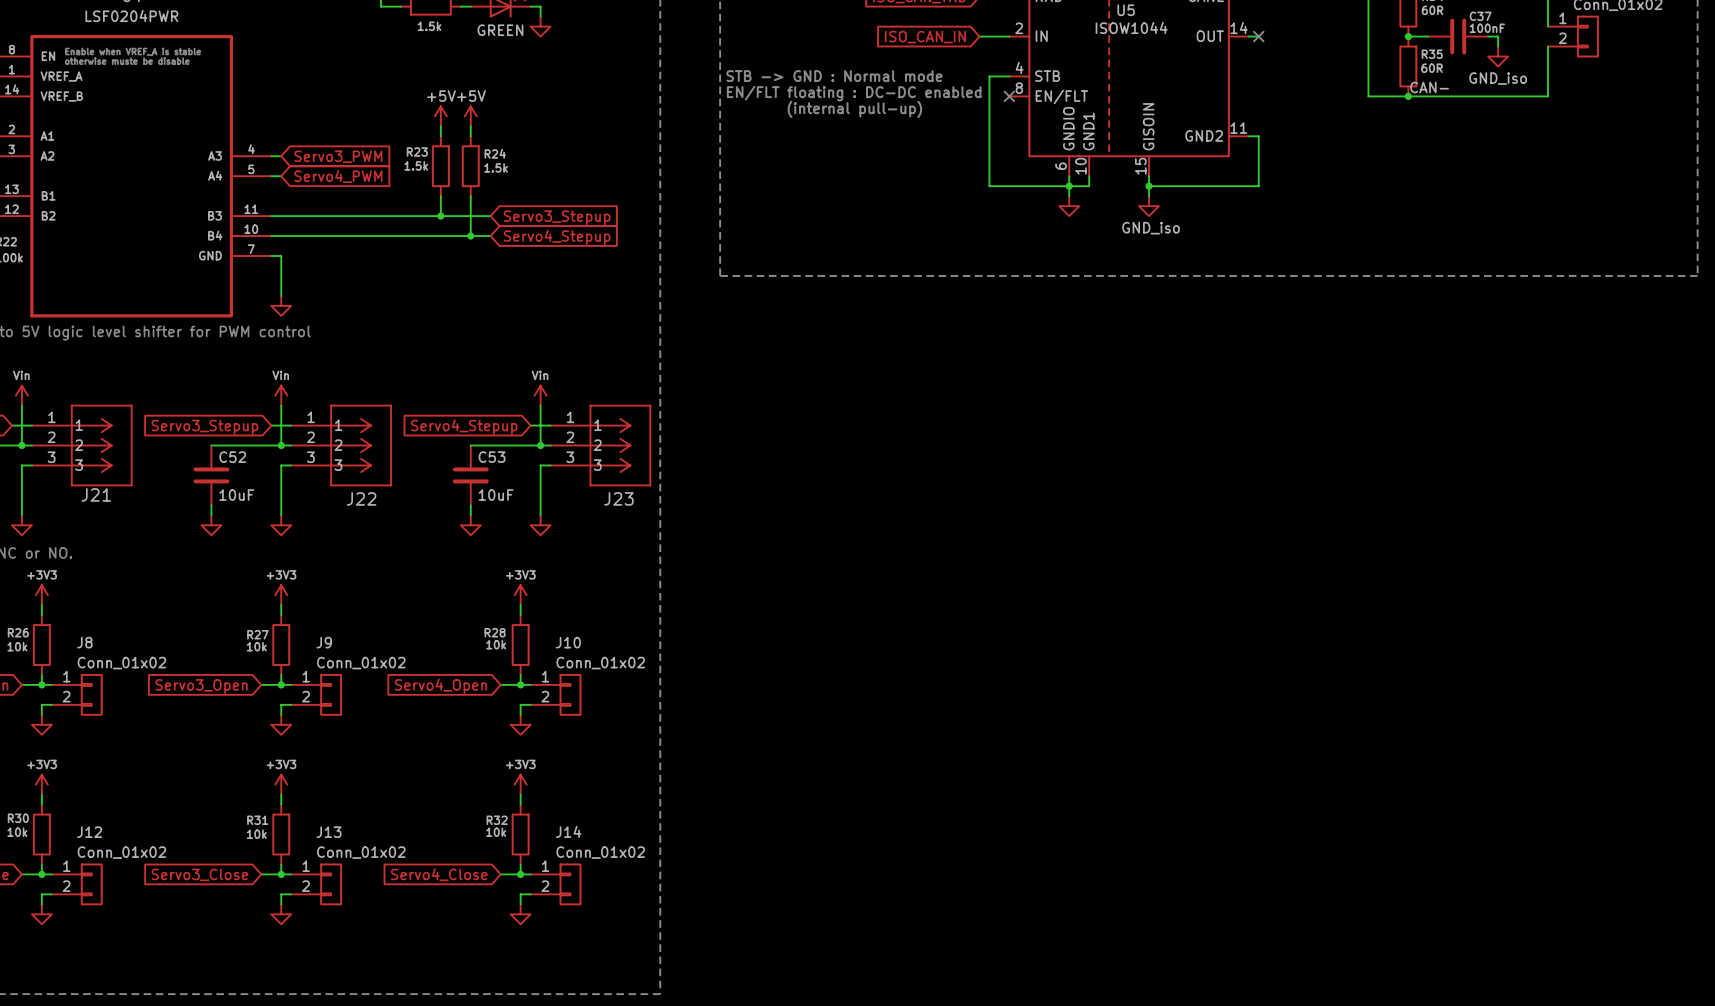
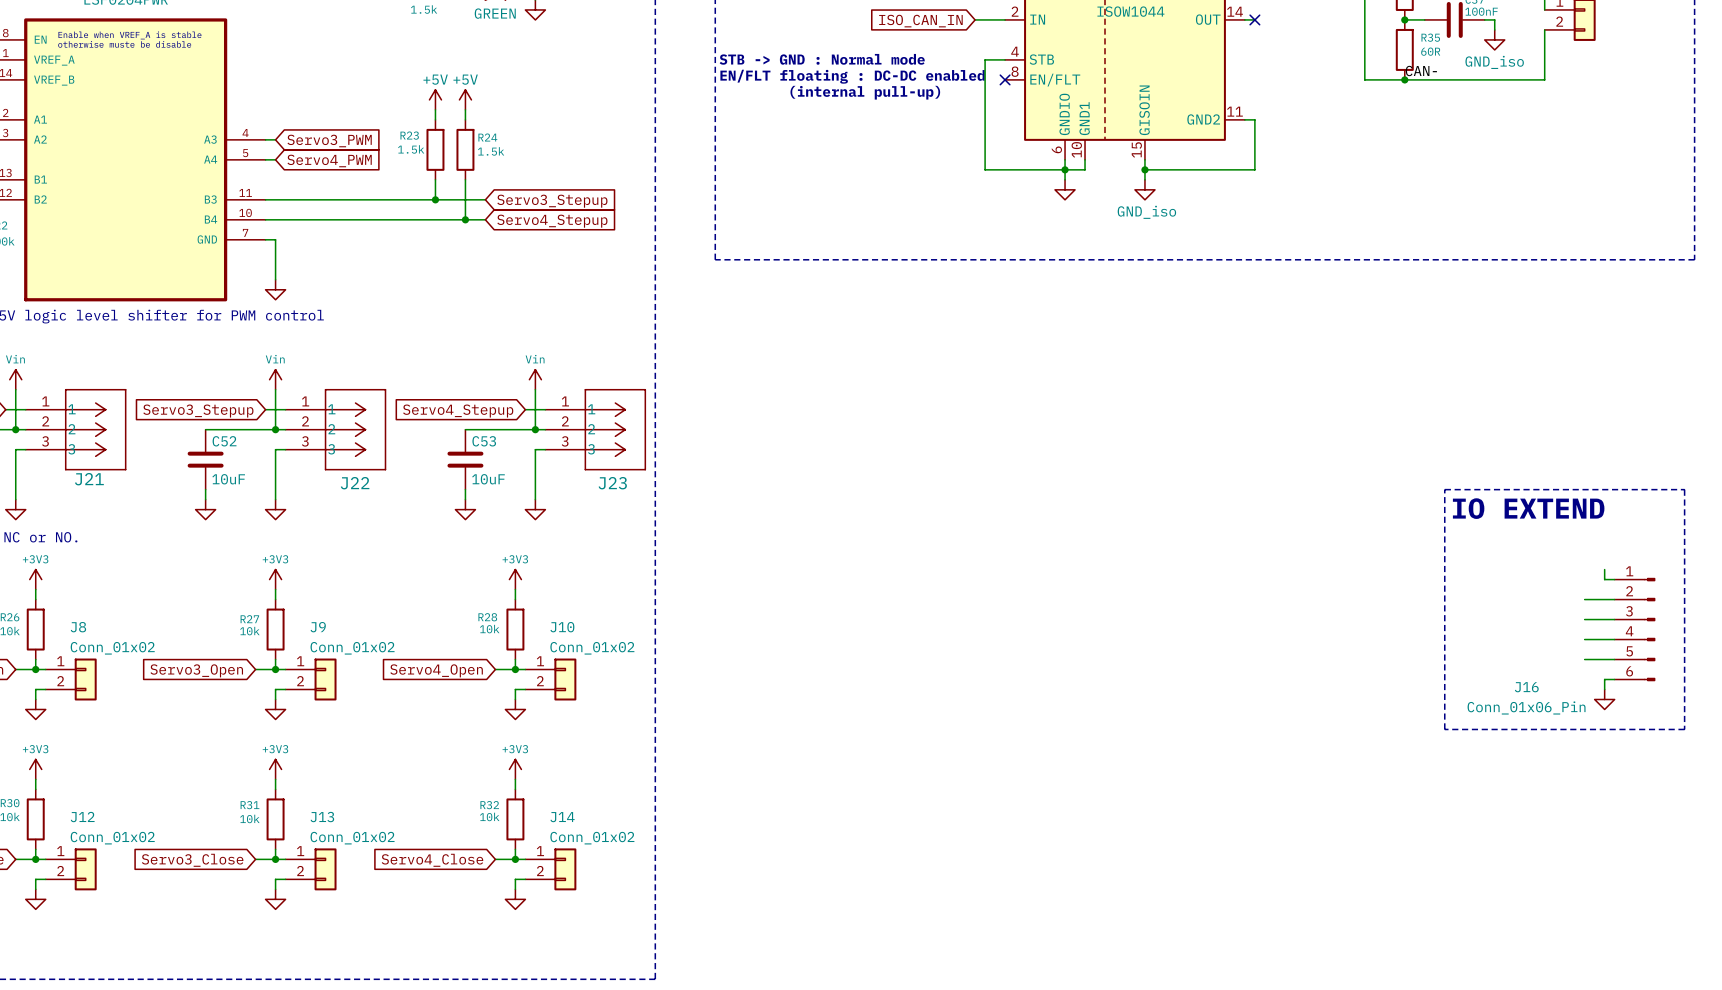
line: none -> (1444, 489) (1684, 489) (1684, 729) (1444, 729) (1444, 489)
text: none -> IO EXTEND (1528, 508)
wire: none -> (1604, 569) (1604, 579) (1614, 579)
wire: none -> (1584, 599) (1614, 599)
wire: none -> (1584, 619) (1614, 619)
J16: none -> Conn_01x06_Pin (1634, 629)
wire: none -> (1584, 639) (1614, 639)
wire: none -> (1584, 659) (1614, 659)
wire: none -> (1614, 679) (1604, 679) (1604, 689)
power symbol: none -> (1604, 699)

